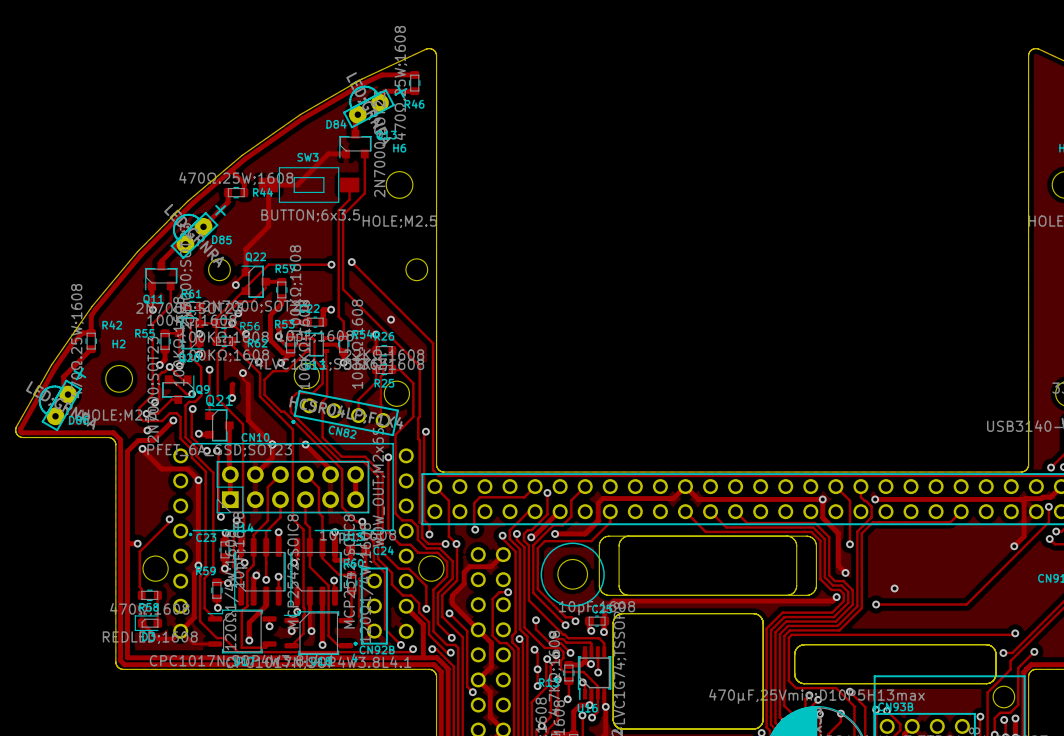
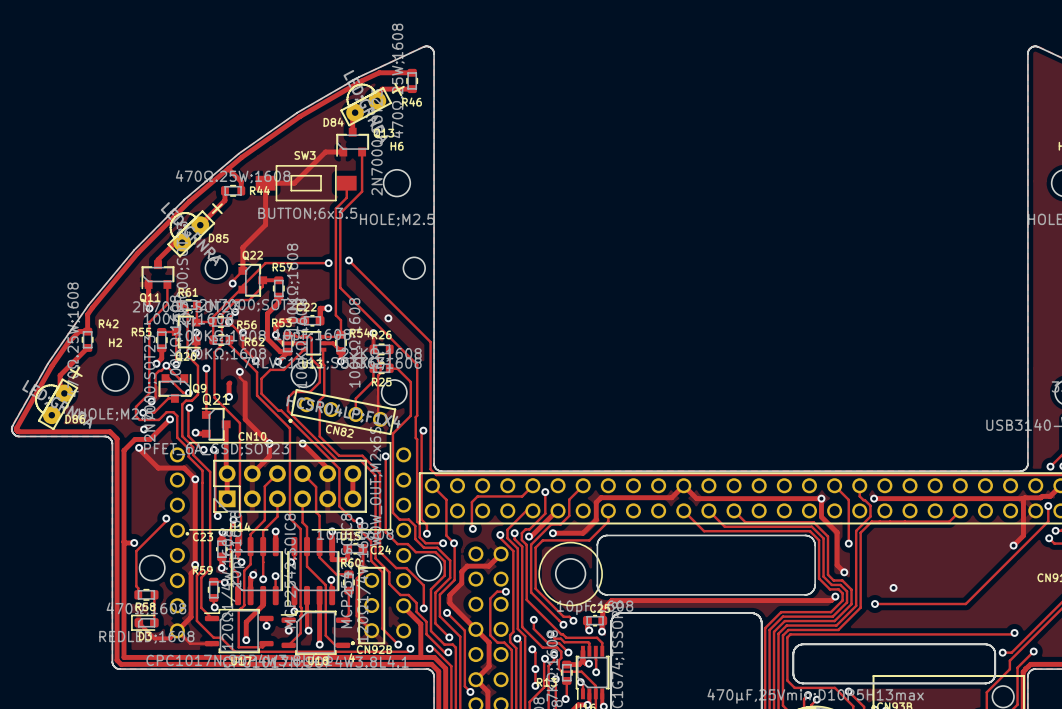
board edge: (628, 536) (789, 536) (794, 539) (796, 545) (796, 588) (793, 593) (787, 595) (626, 595) (621, 591) (619, 586) (619, 545) (621, 539) (628, 536) -> none

